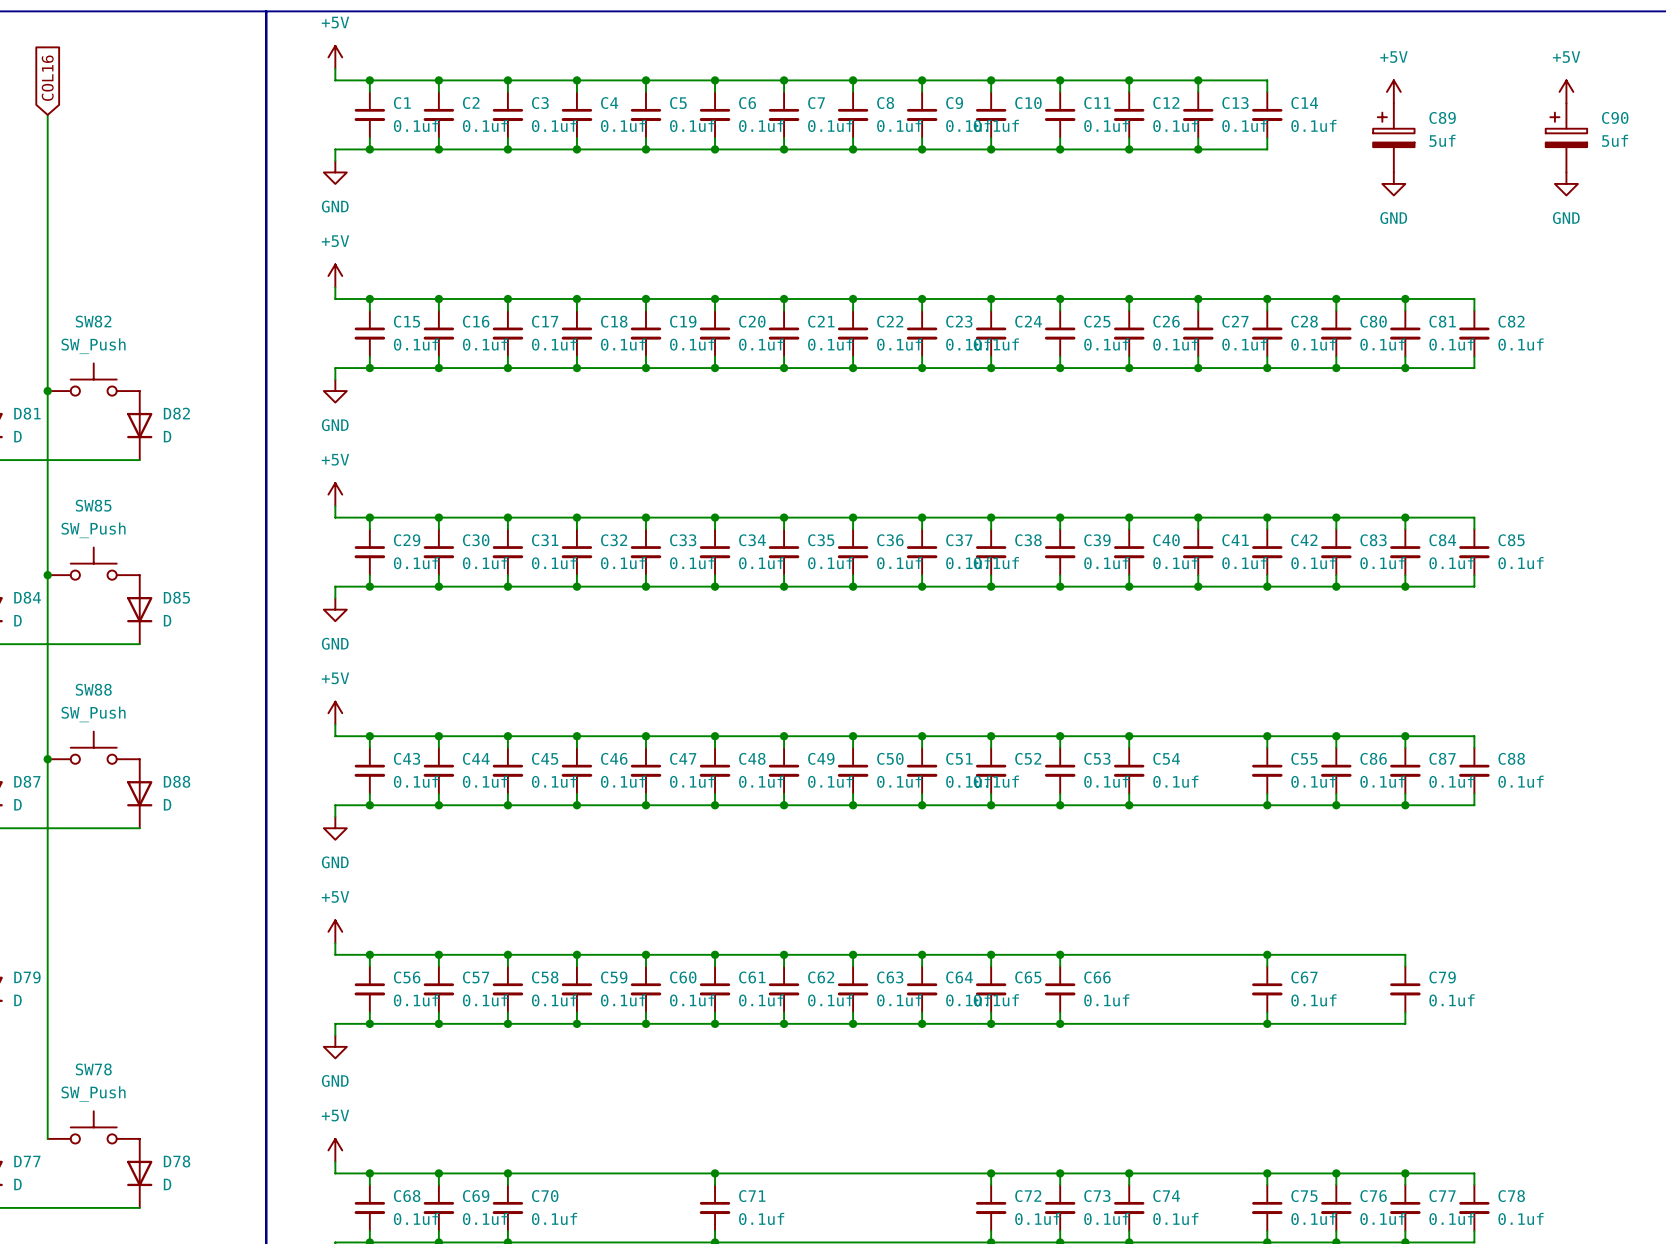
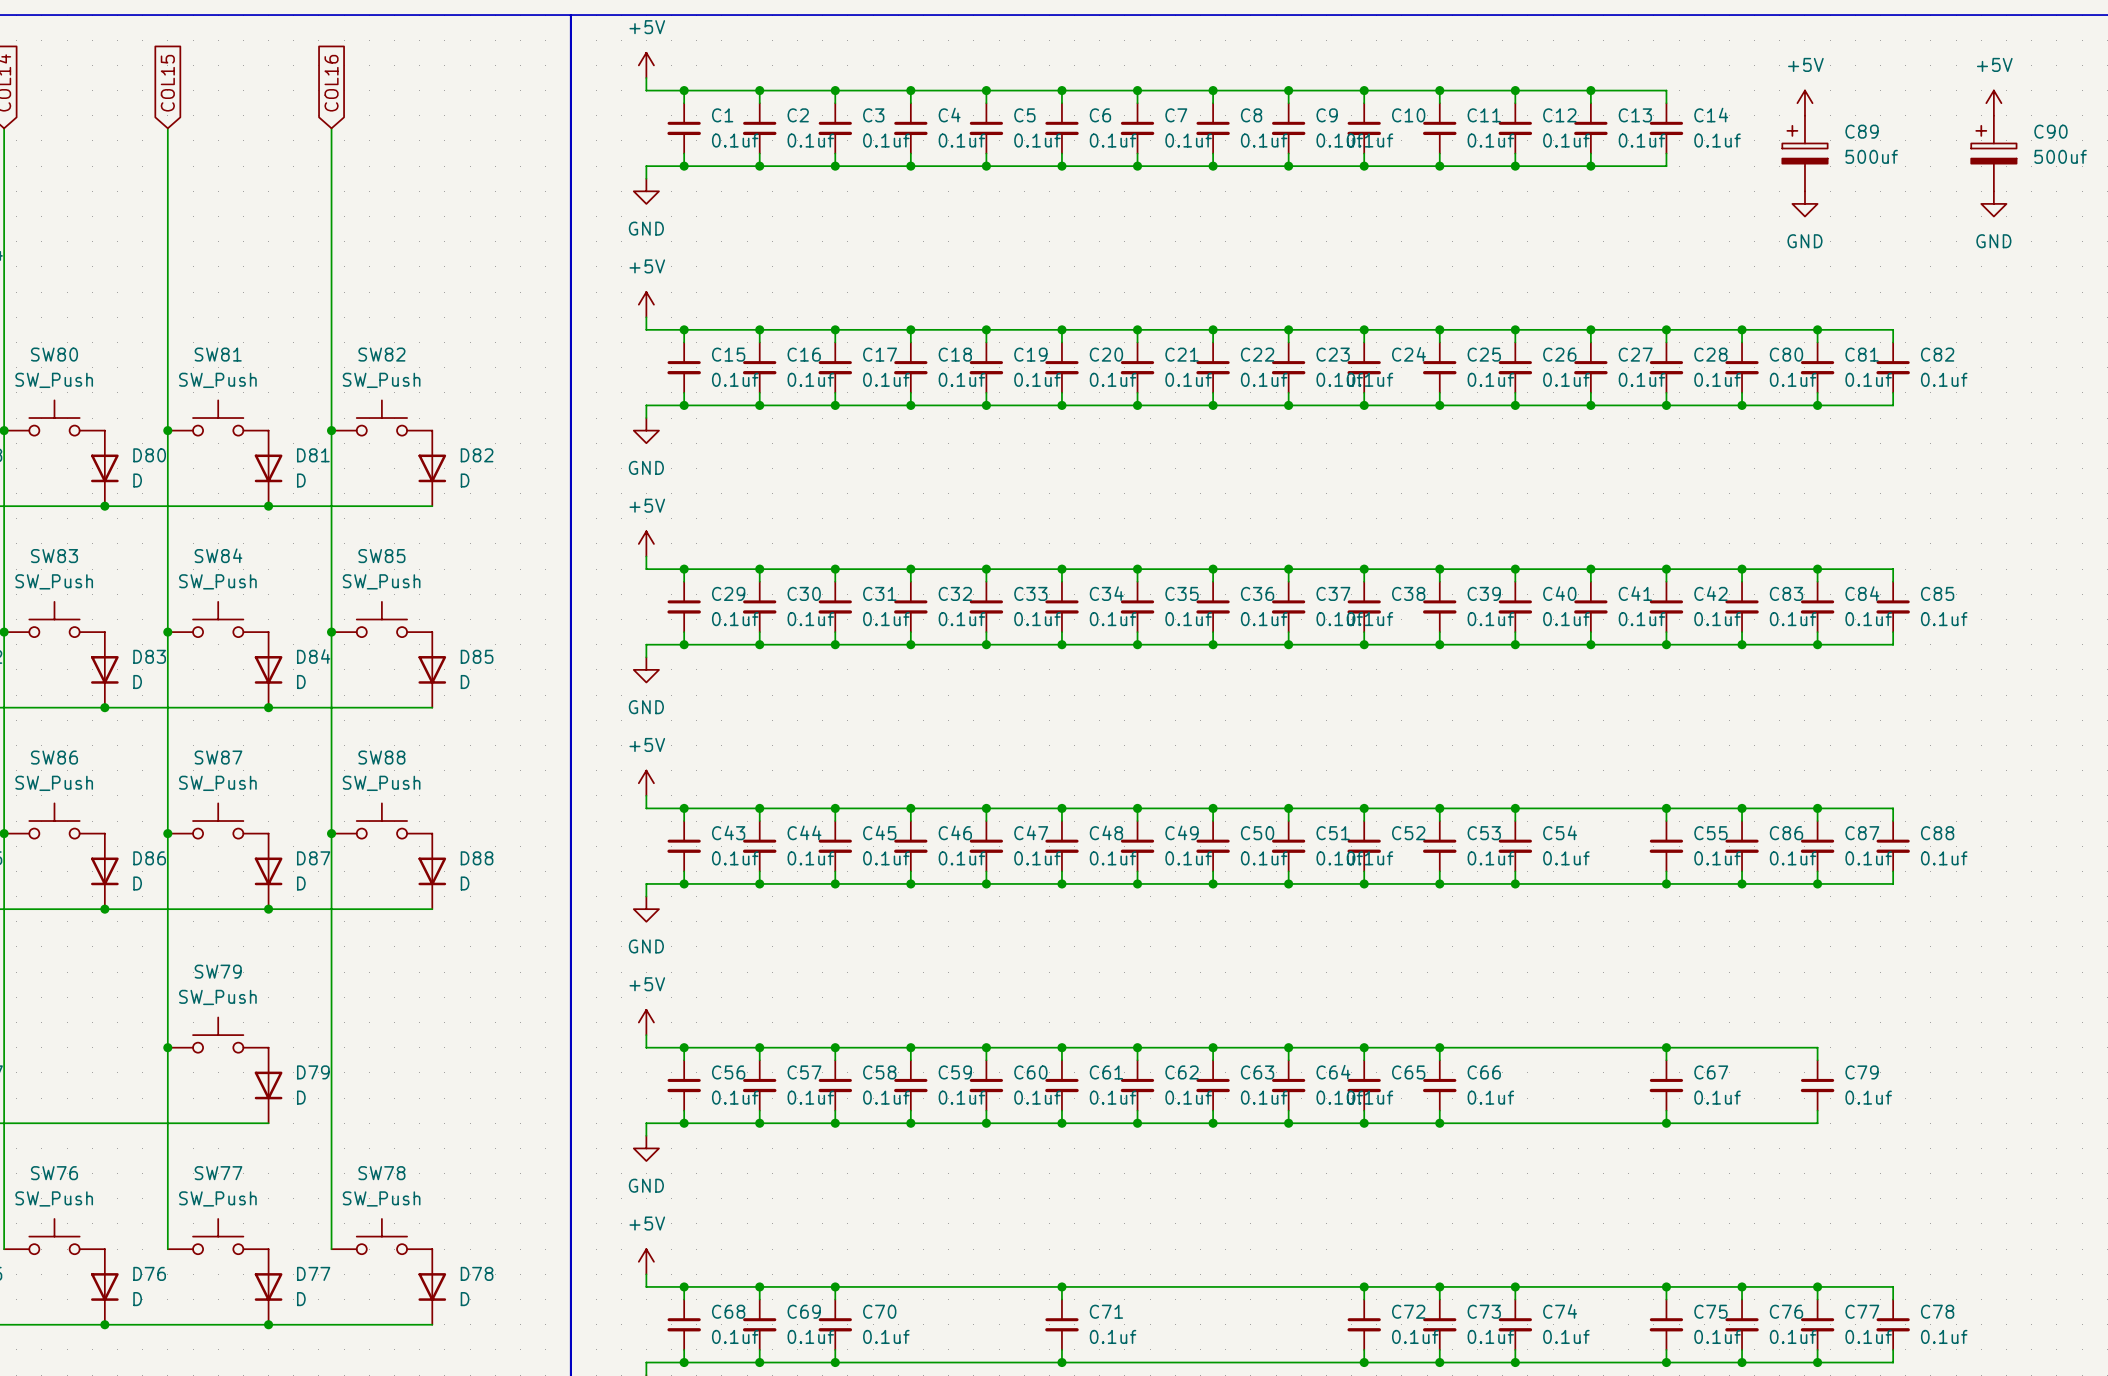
C89 value: 5uf (1442, 140) -> 500uf (1871, 156)
C90 value: 5uf (1615, 140) -> 500uf (2060, 156)

